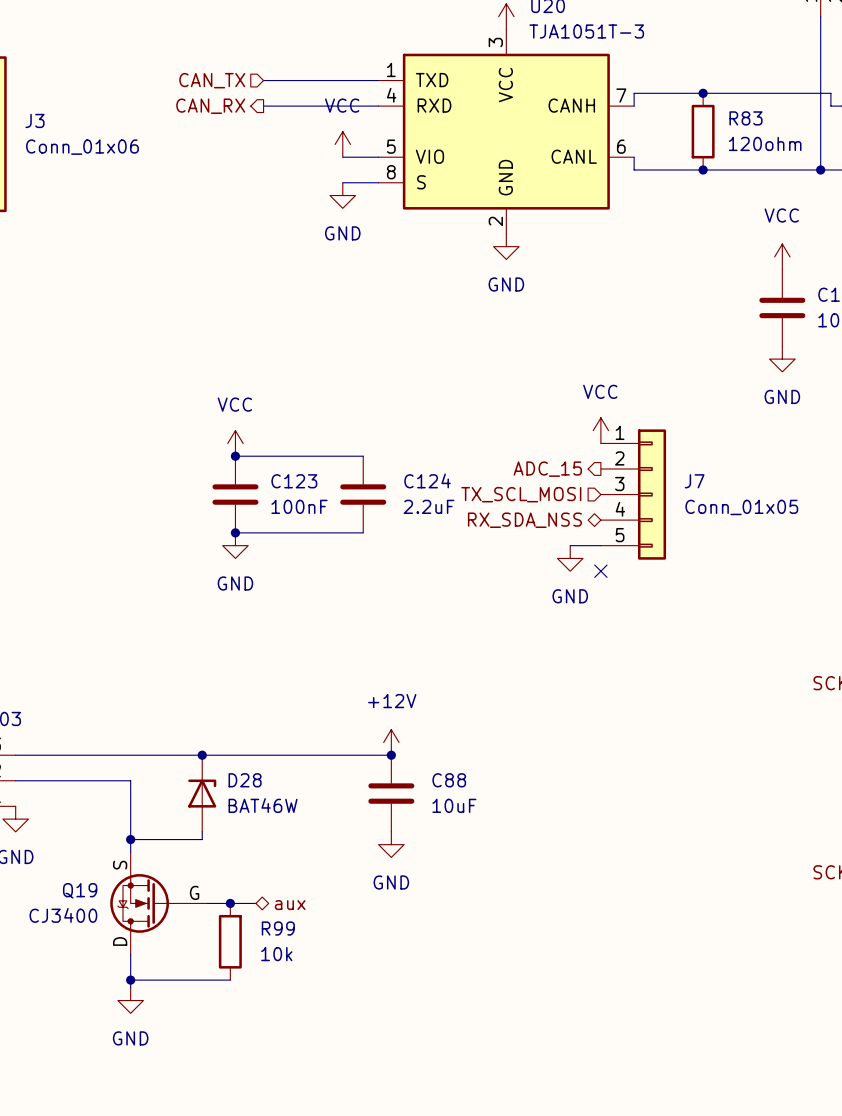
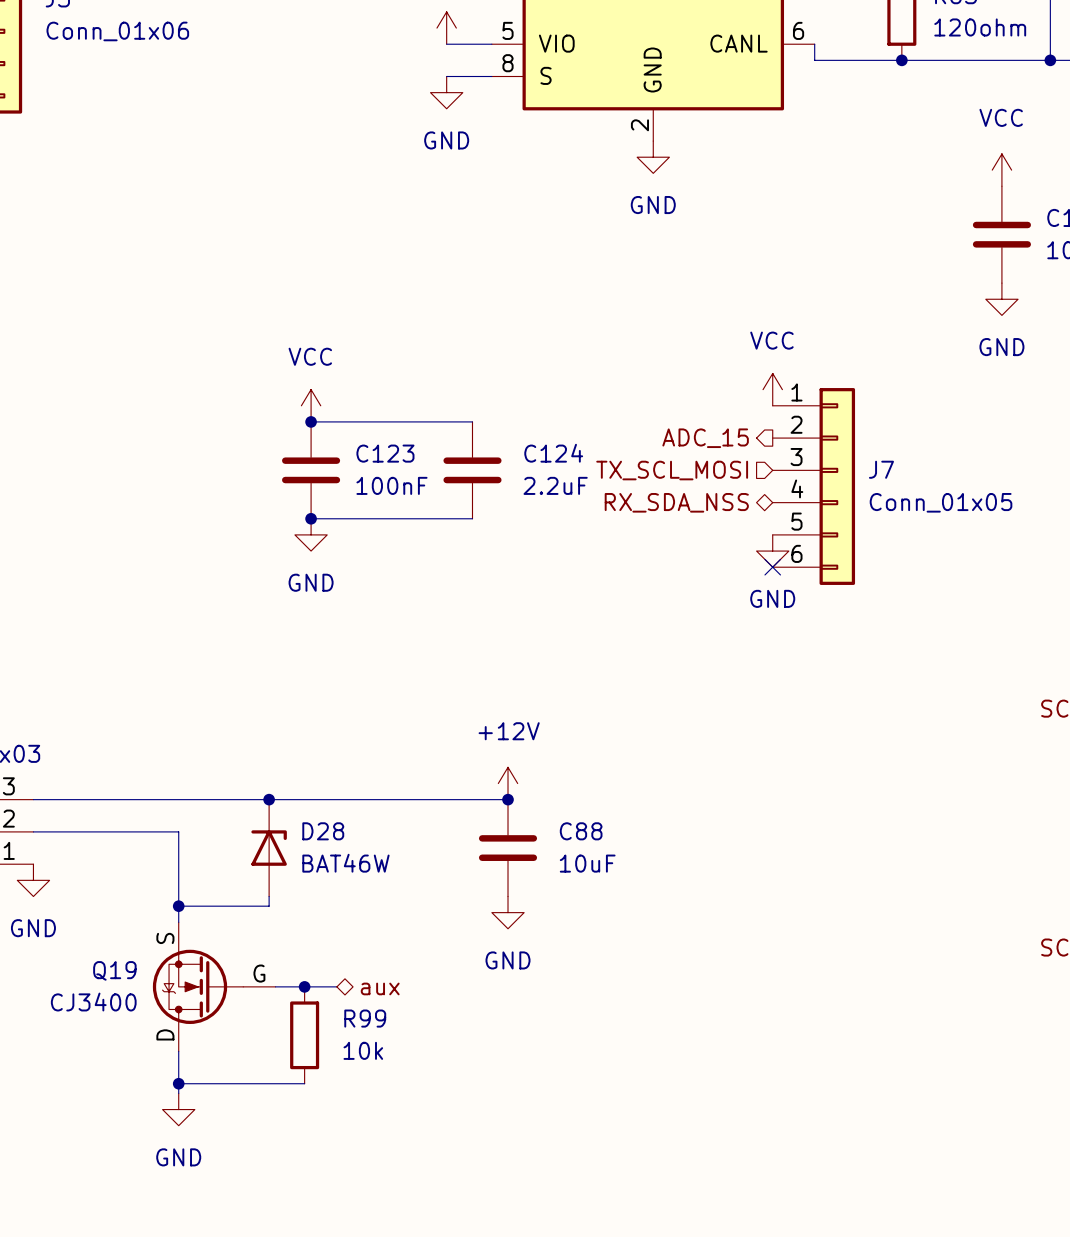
J7 symbol: [600, 429, 667, 560] -> [772, 388, 856, 585]
wire: (570, 545) (600, 545) -> none
power symbol position: GND (570, 558) -> GND (772, 551)

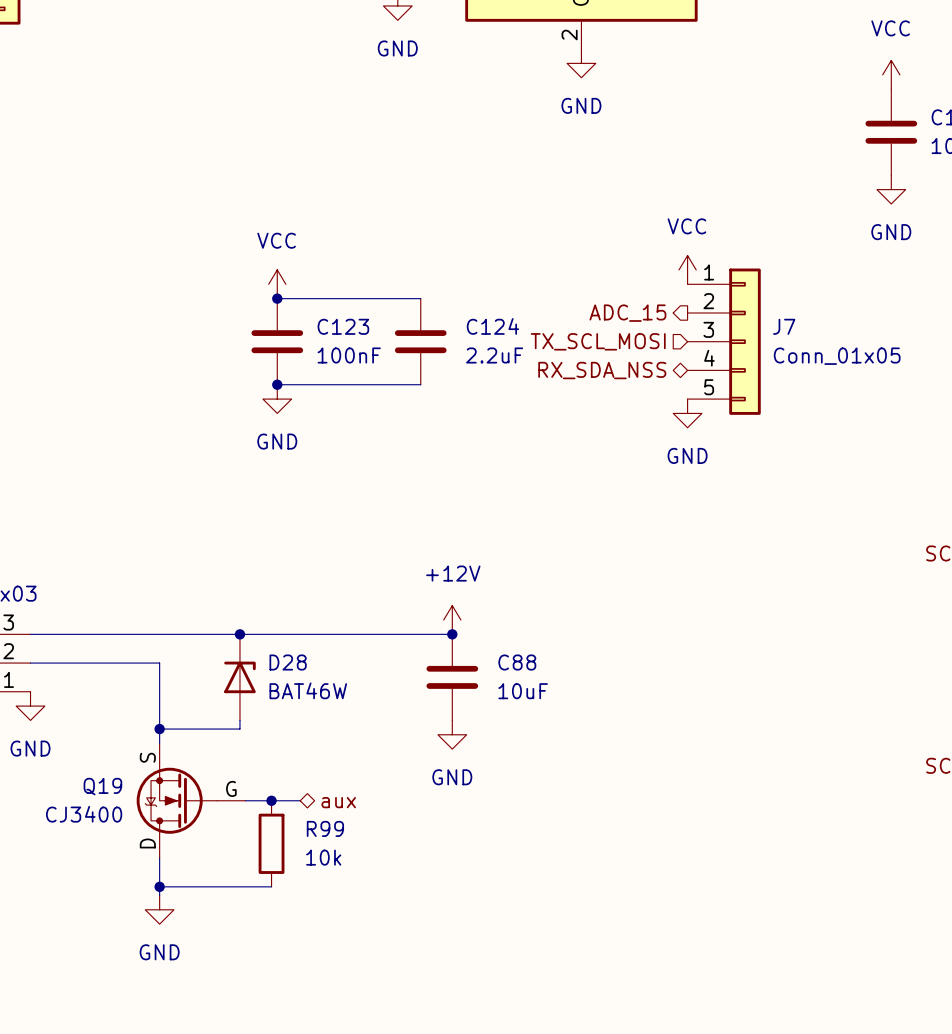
J7 symbol: [772, 388, 856, 585] -> [687, 268, 761, 415]
no-connect mark: (772, 567) -> none

